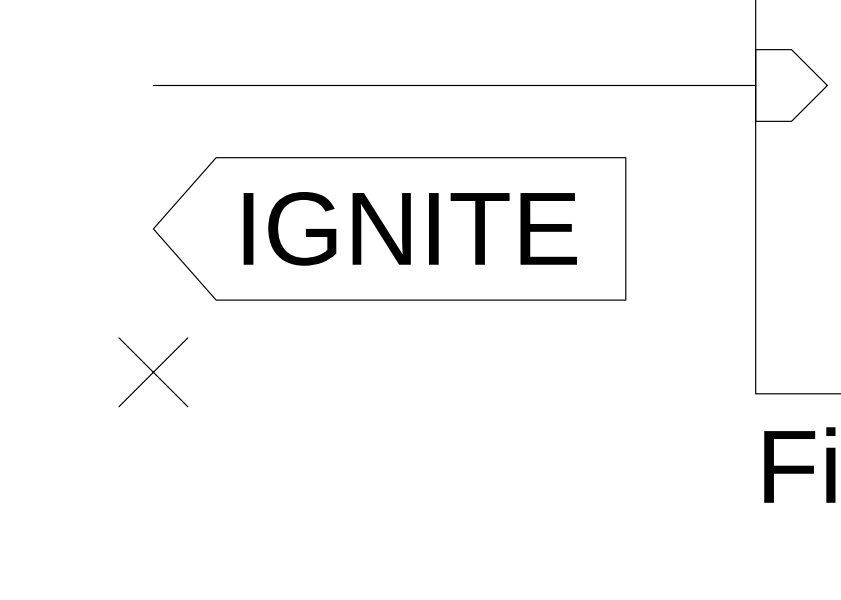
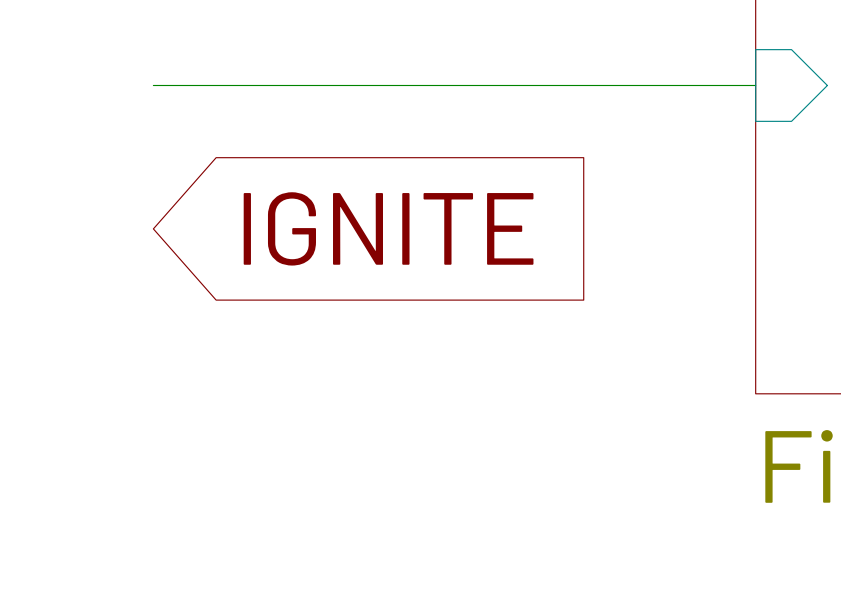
no-connect mark: (153, 372) -> none

